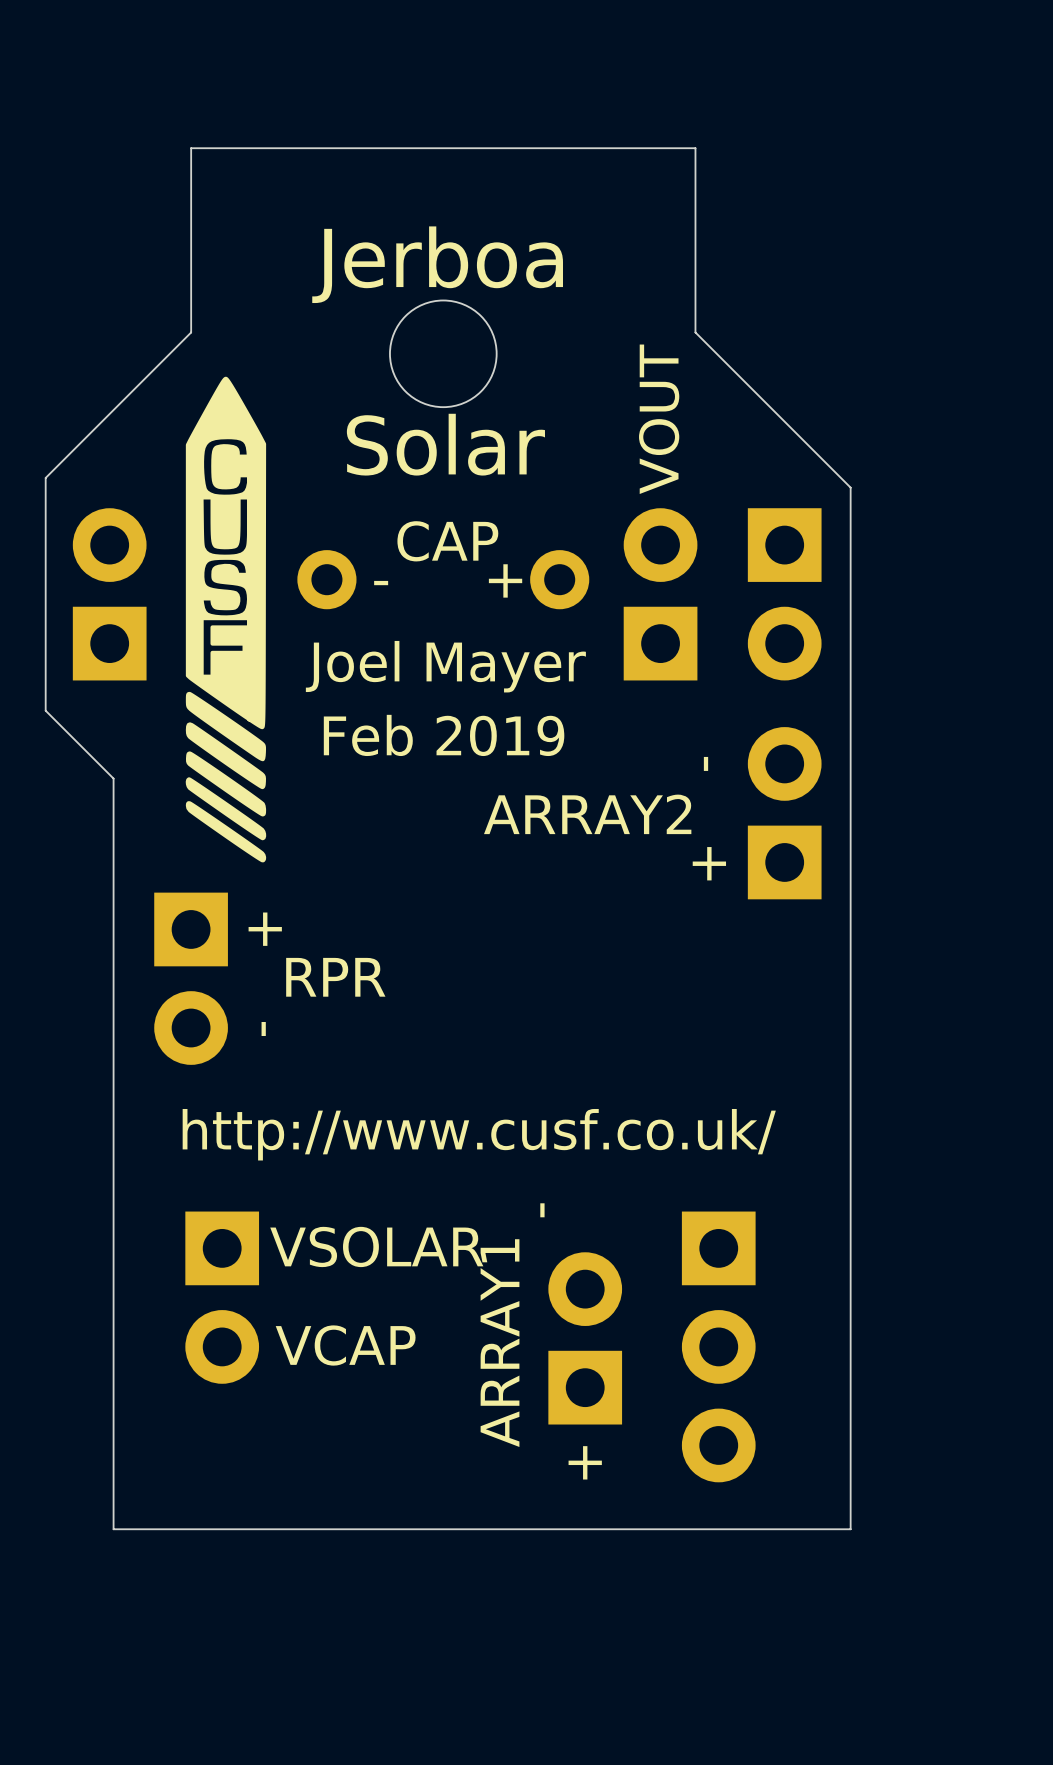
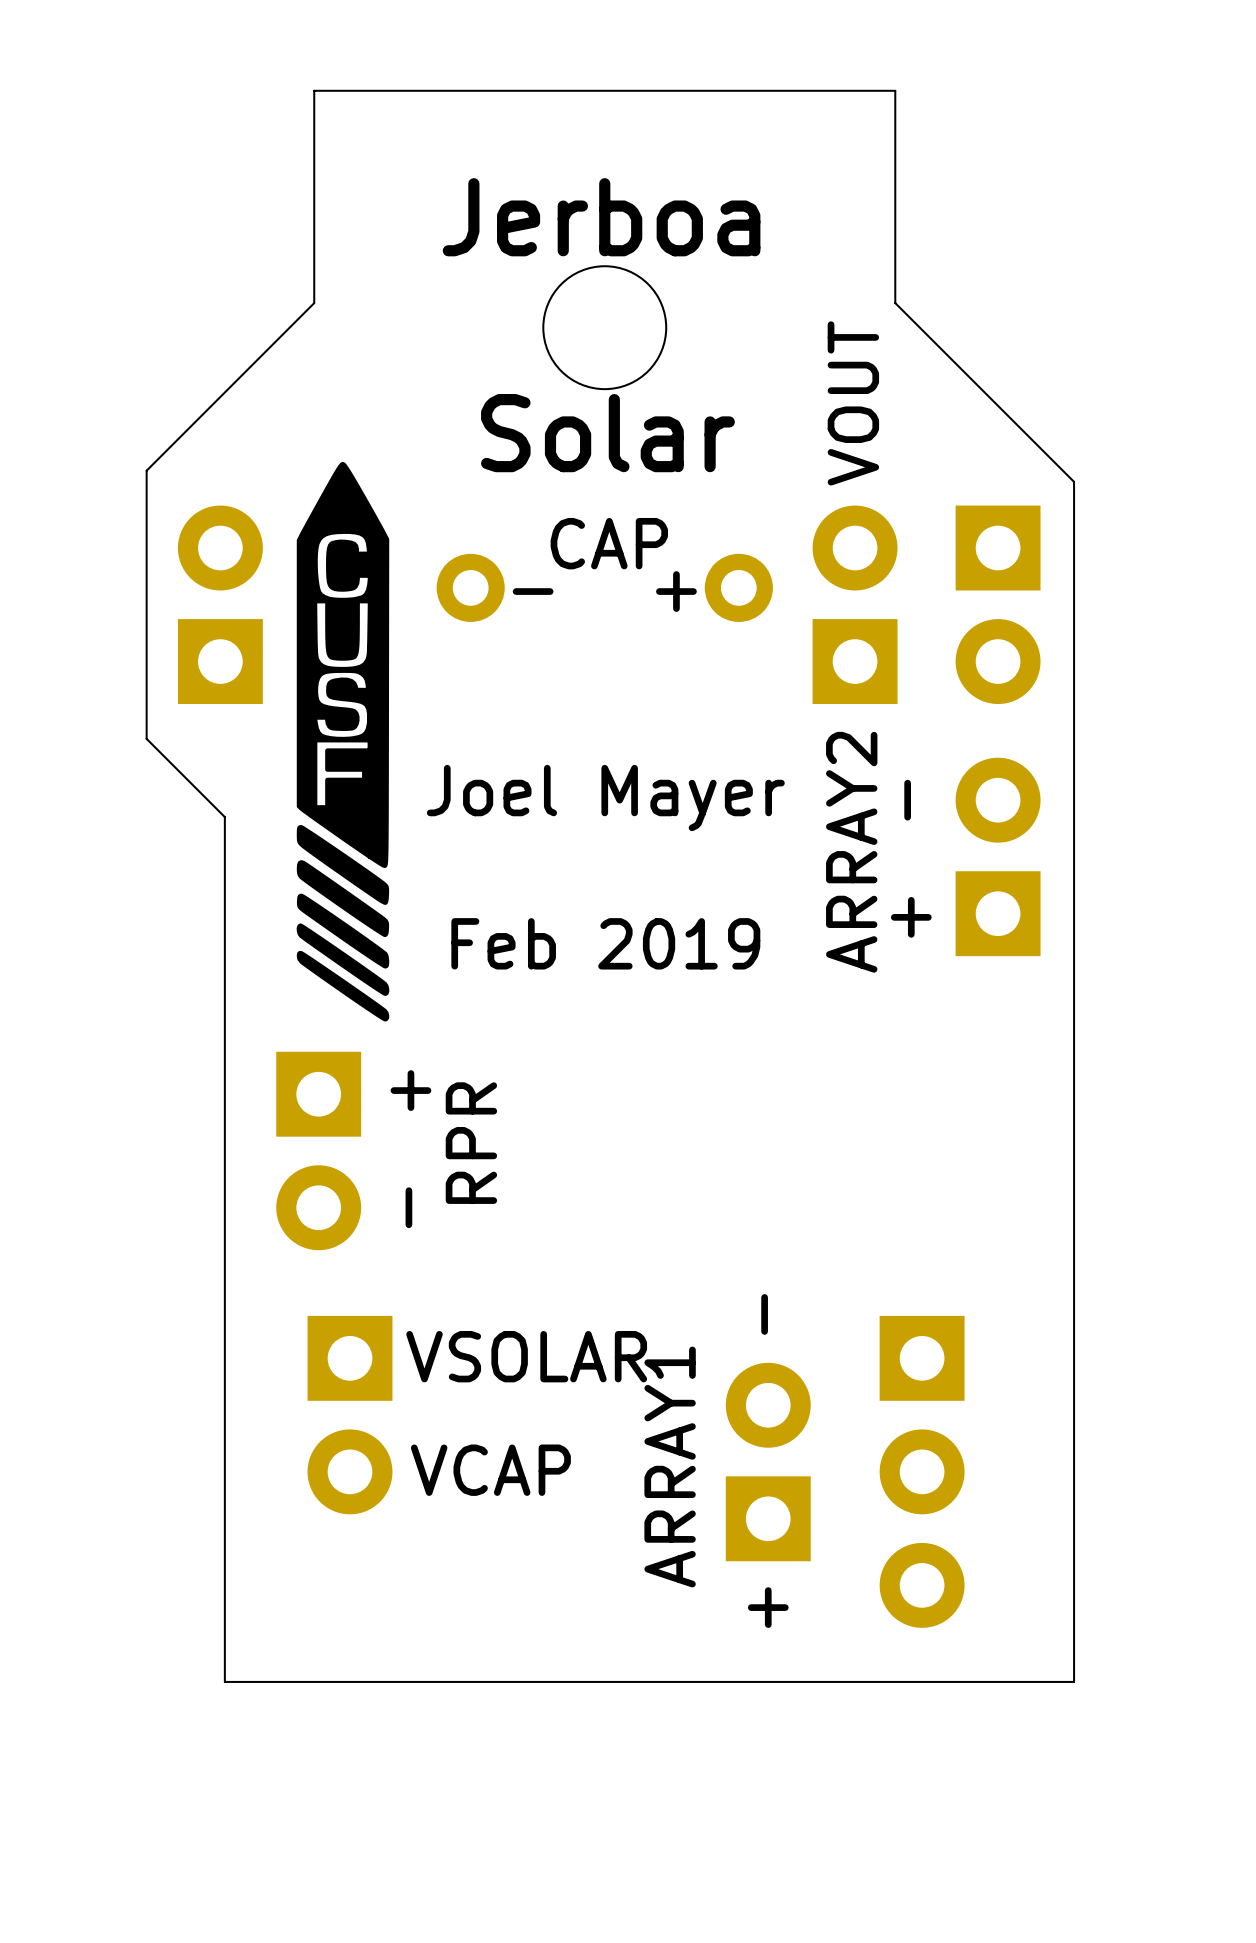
drawing position: (225, 619) -> (342, 741)
text: Joel Mayer (445, 666) -> none
text: Feb 2019 (444, 735) -> Joel Mayer (605, 798)
text rotation: 0° (587, 814) -> 90° counterclockwise (851, 852)
text: none -> Feb 2019 (605, 943)
text: + (265, 929) -> none
text rotation: 0° (335, 977) -> 90° counterclockwise (471, 1143)
part position: (191, 978) -> (318, 1150)
text: - (263, 1028) -> + (410, 1090)
text: none -> - (408, 1207)
text: http://www.cusf.co.uk/ (479, 1134) -> none
text position: - (542, 1210) -> - (764, 1314)

